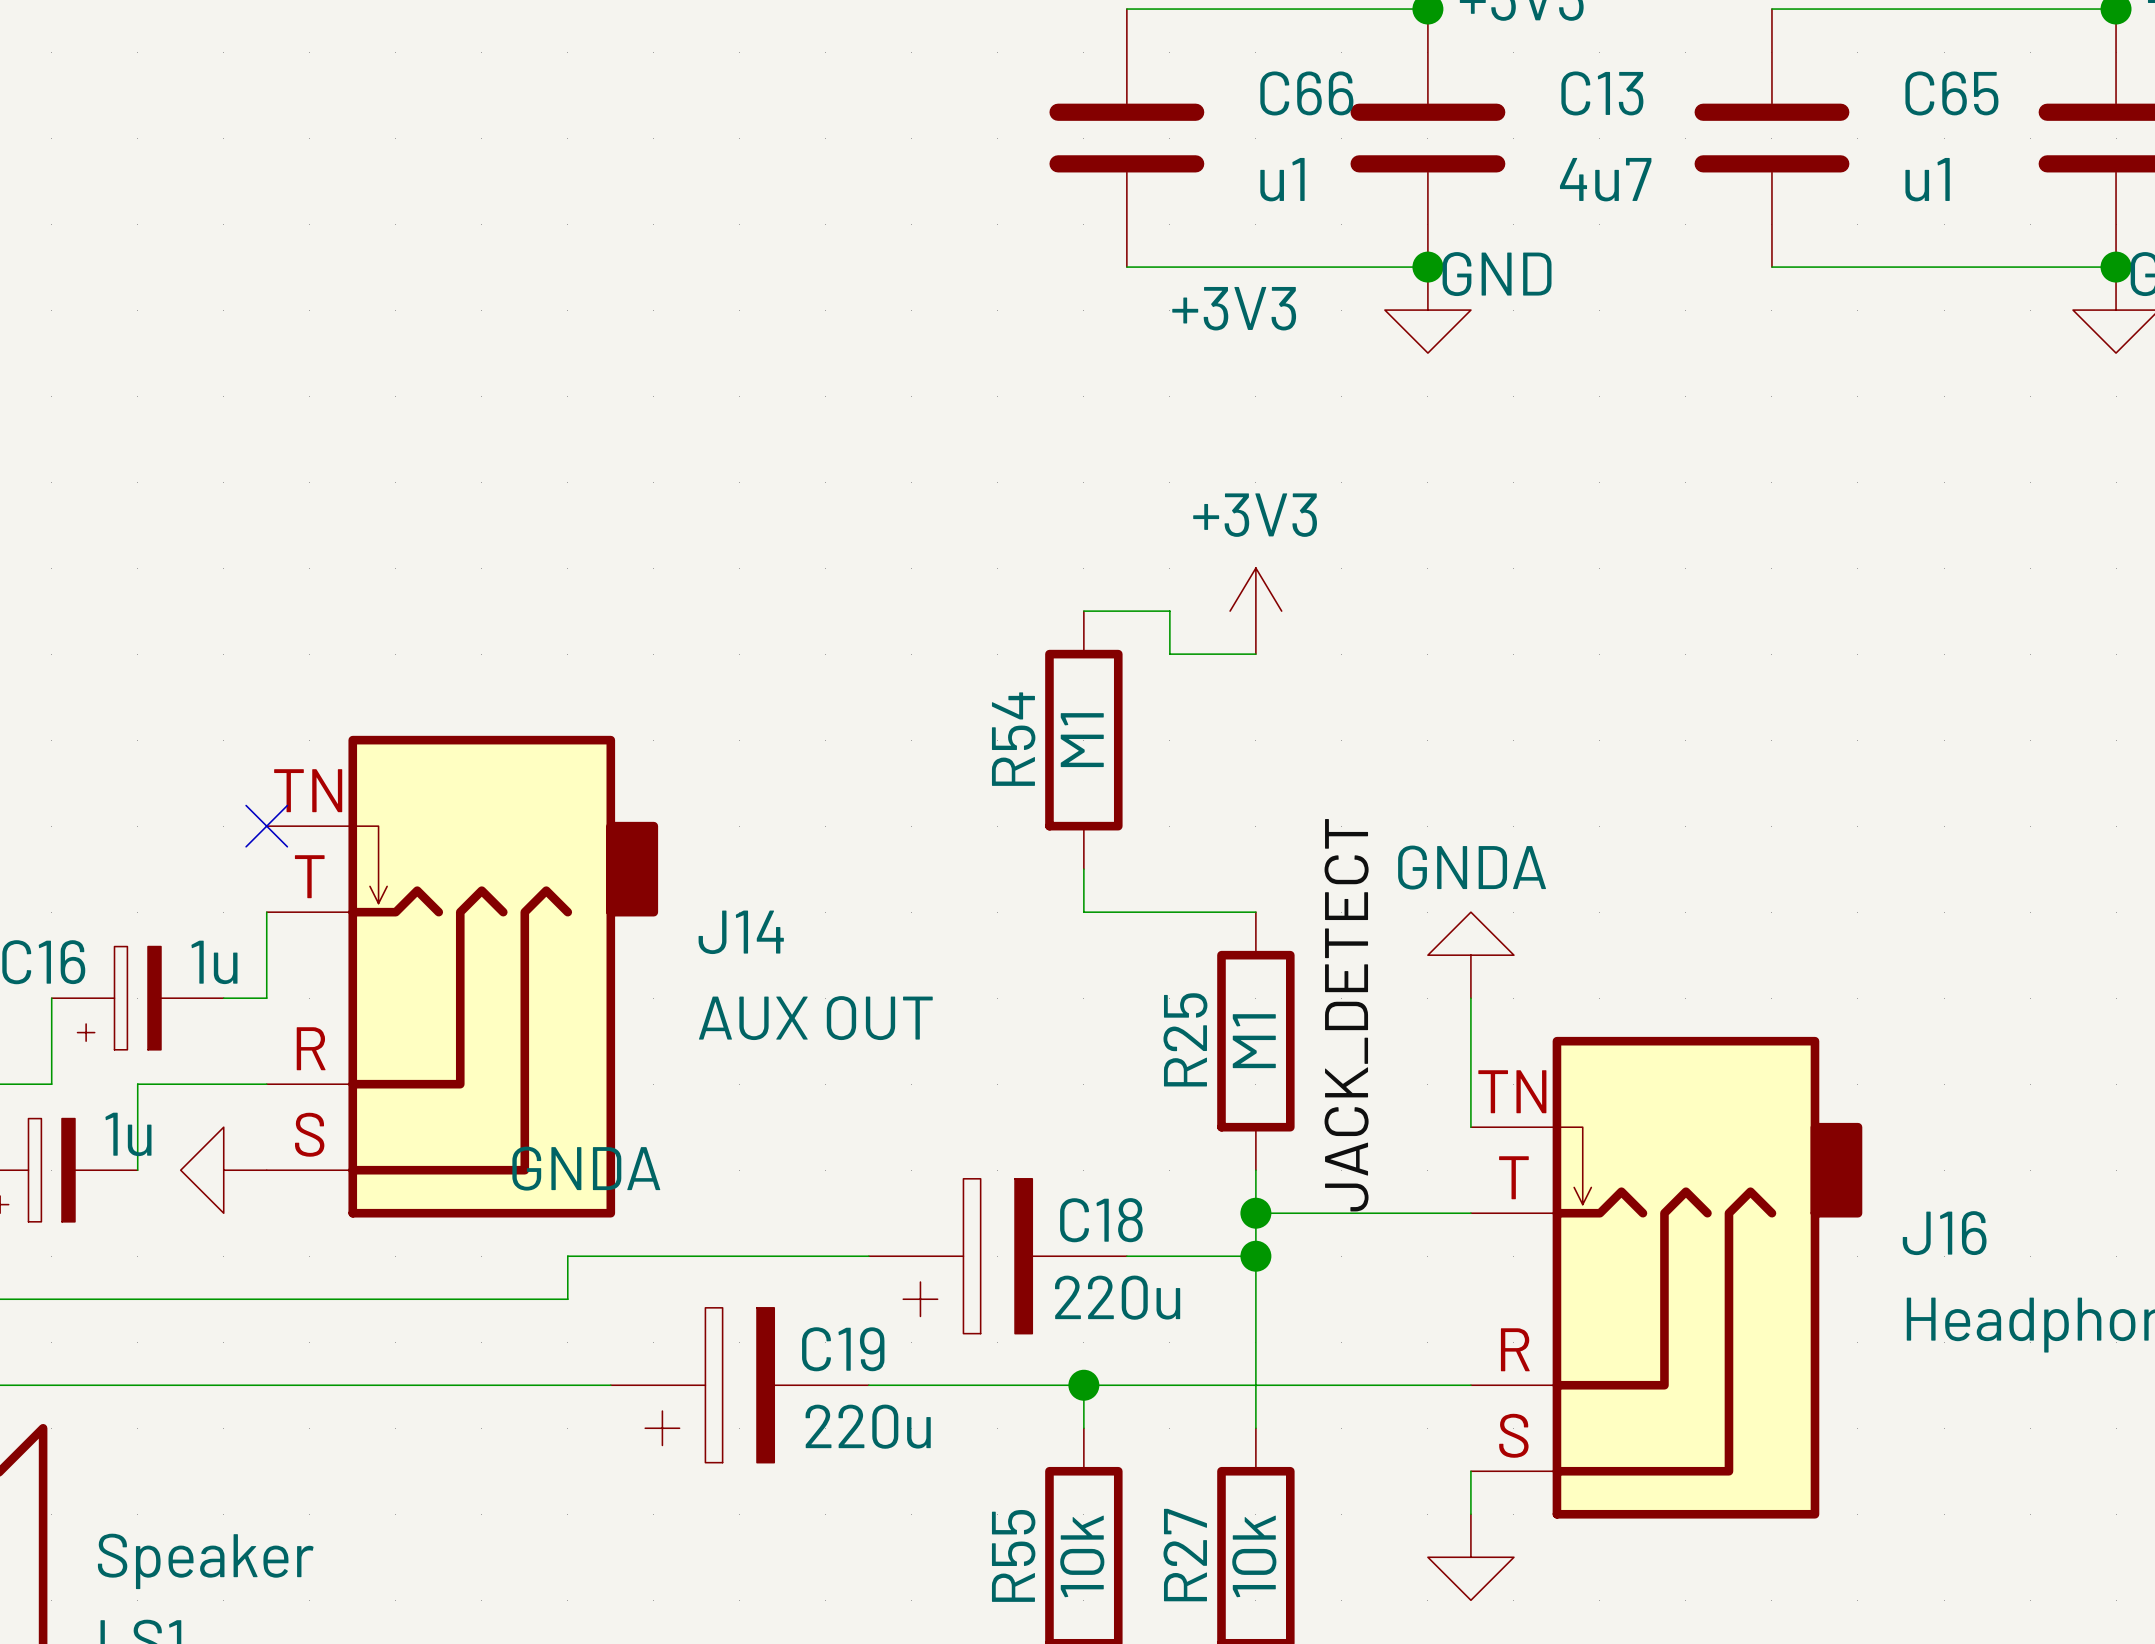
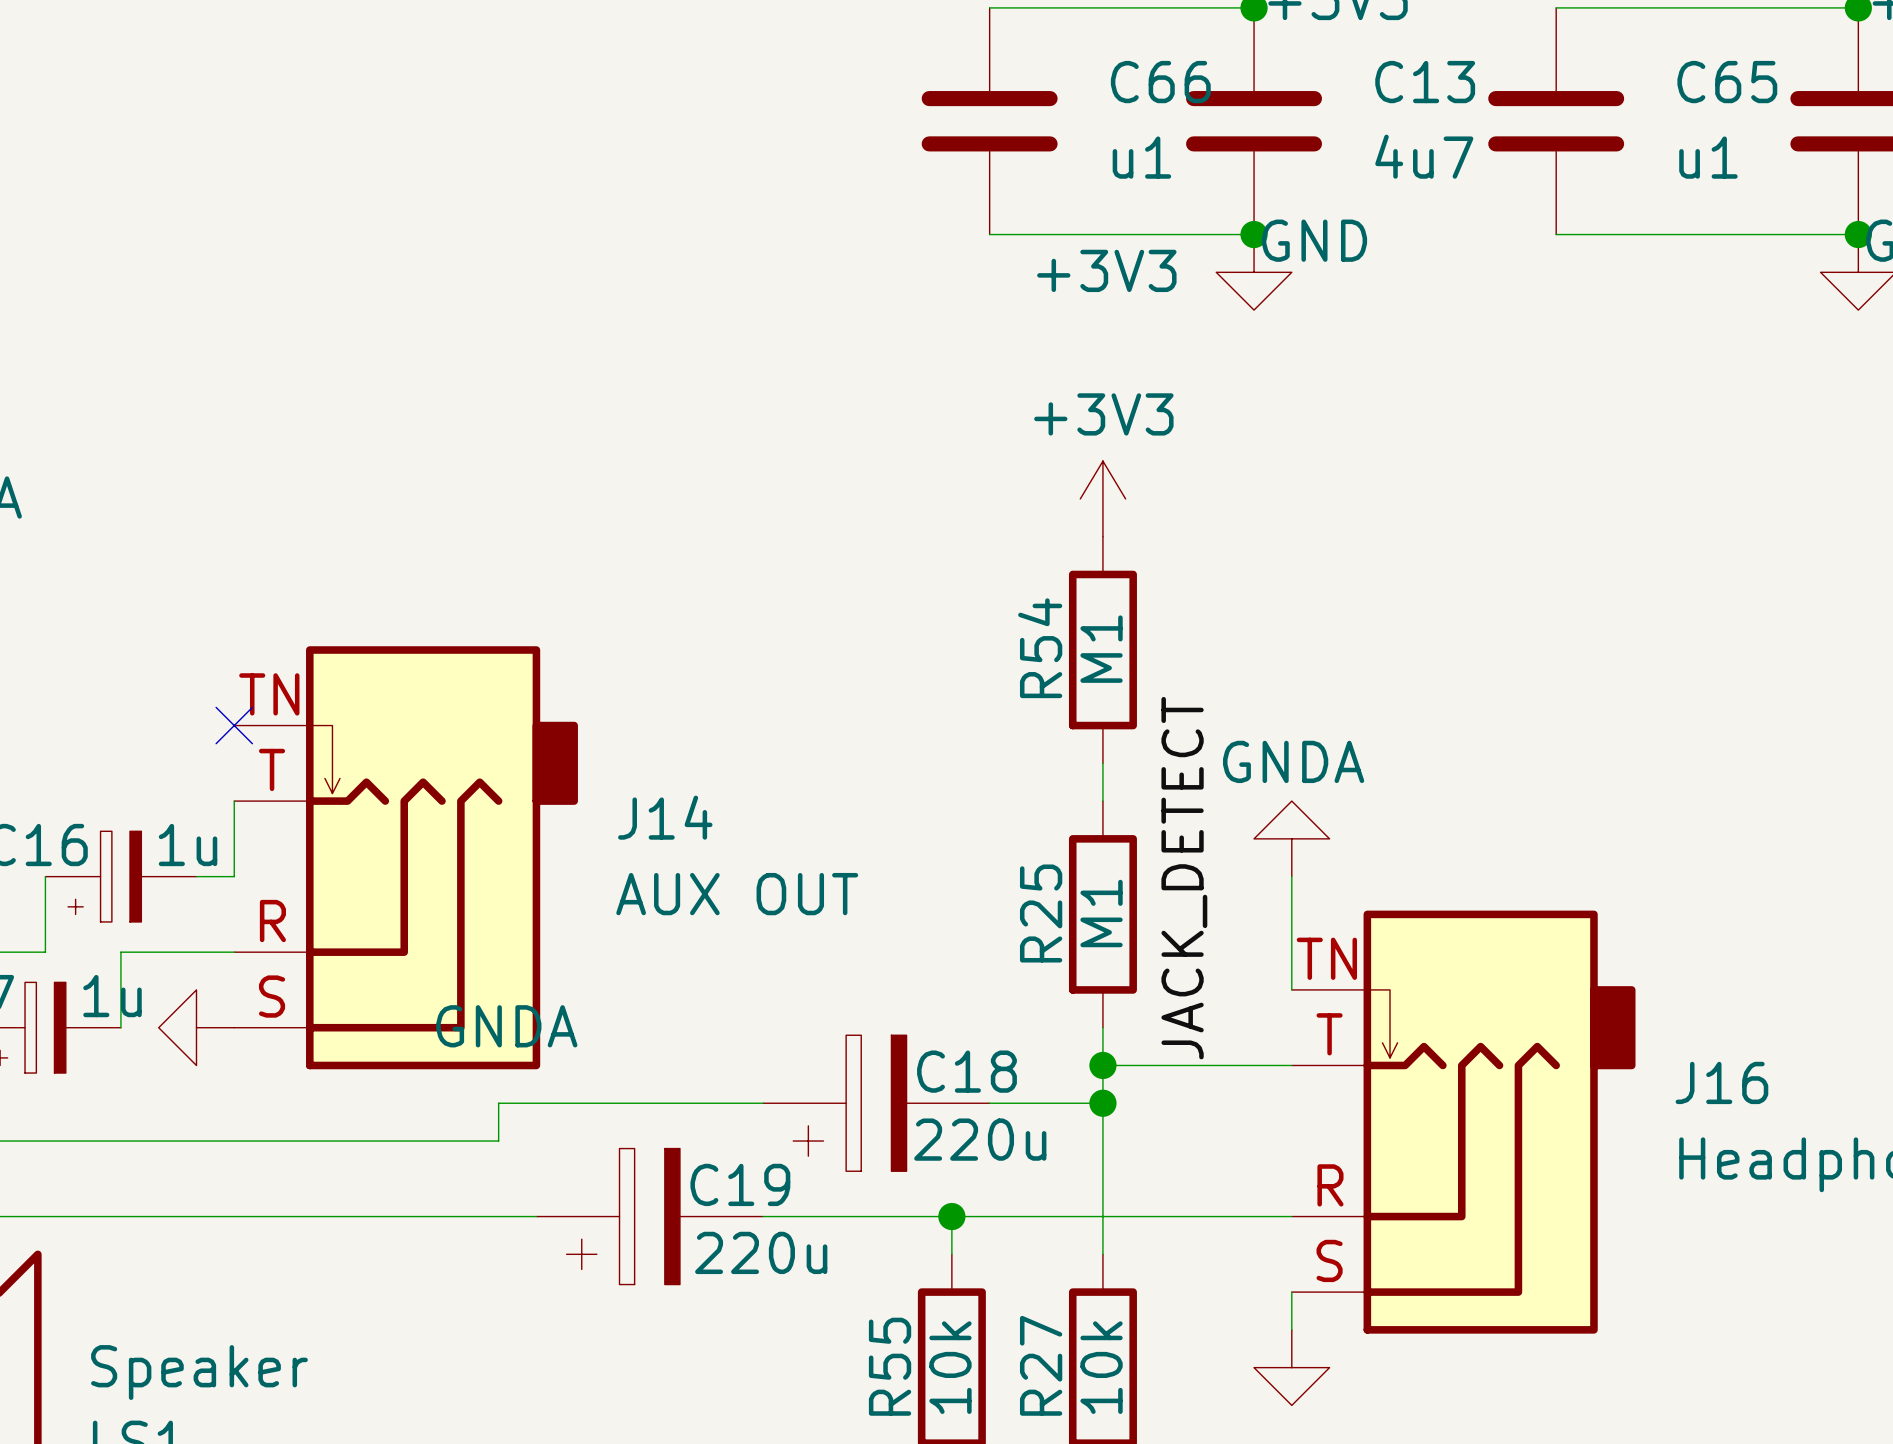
wire: (1083, 611) (1169, 611) (1169, 654) (1255, 654) -> none
power symbol position: +3V3 (1255, 611) -> +3V3 (1102, 498)
R54 position: (1083, 740) -> (1102, 650)
wire: (1083, 869) (1083, 912) (1255, 912) -> (1102, 763) (1102, 801)

